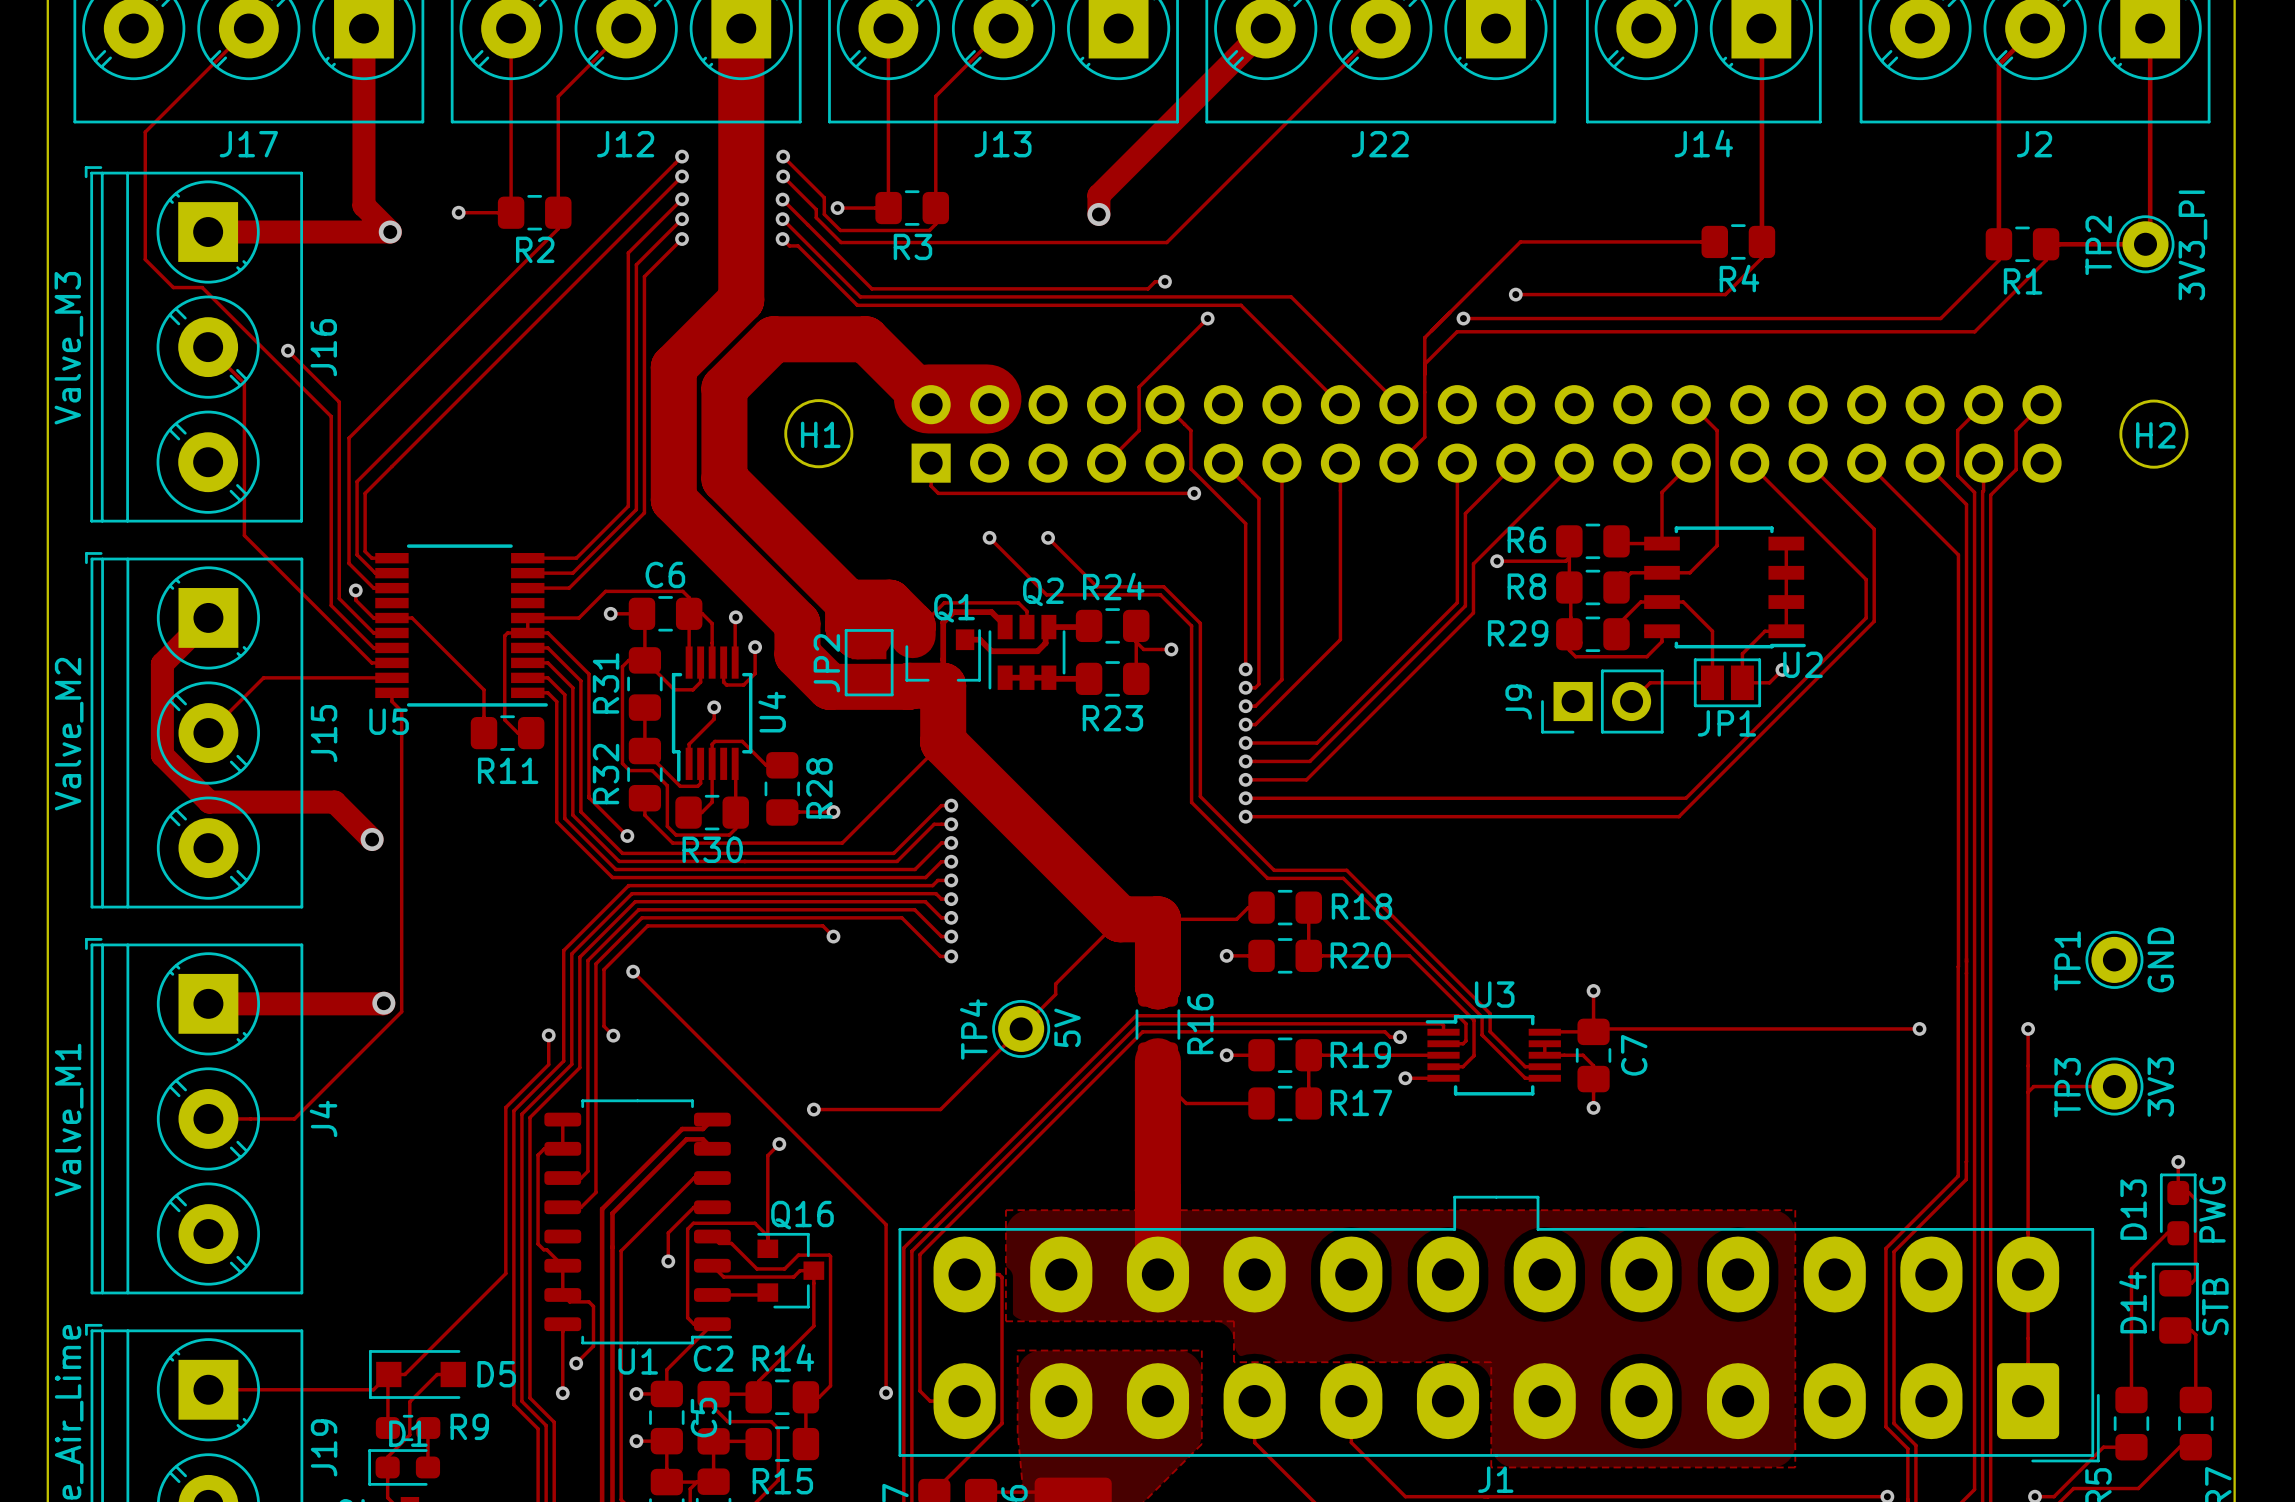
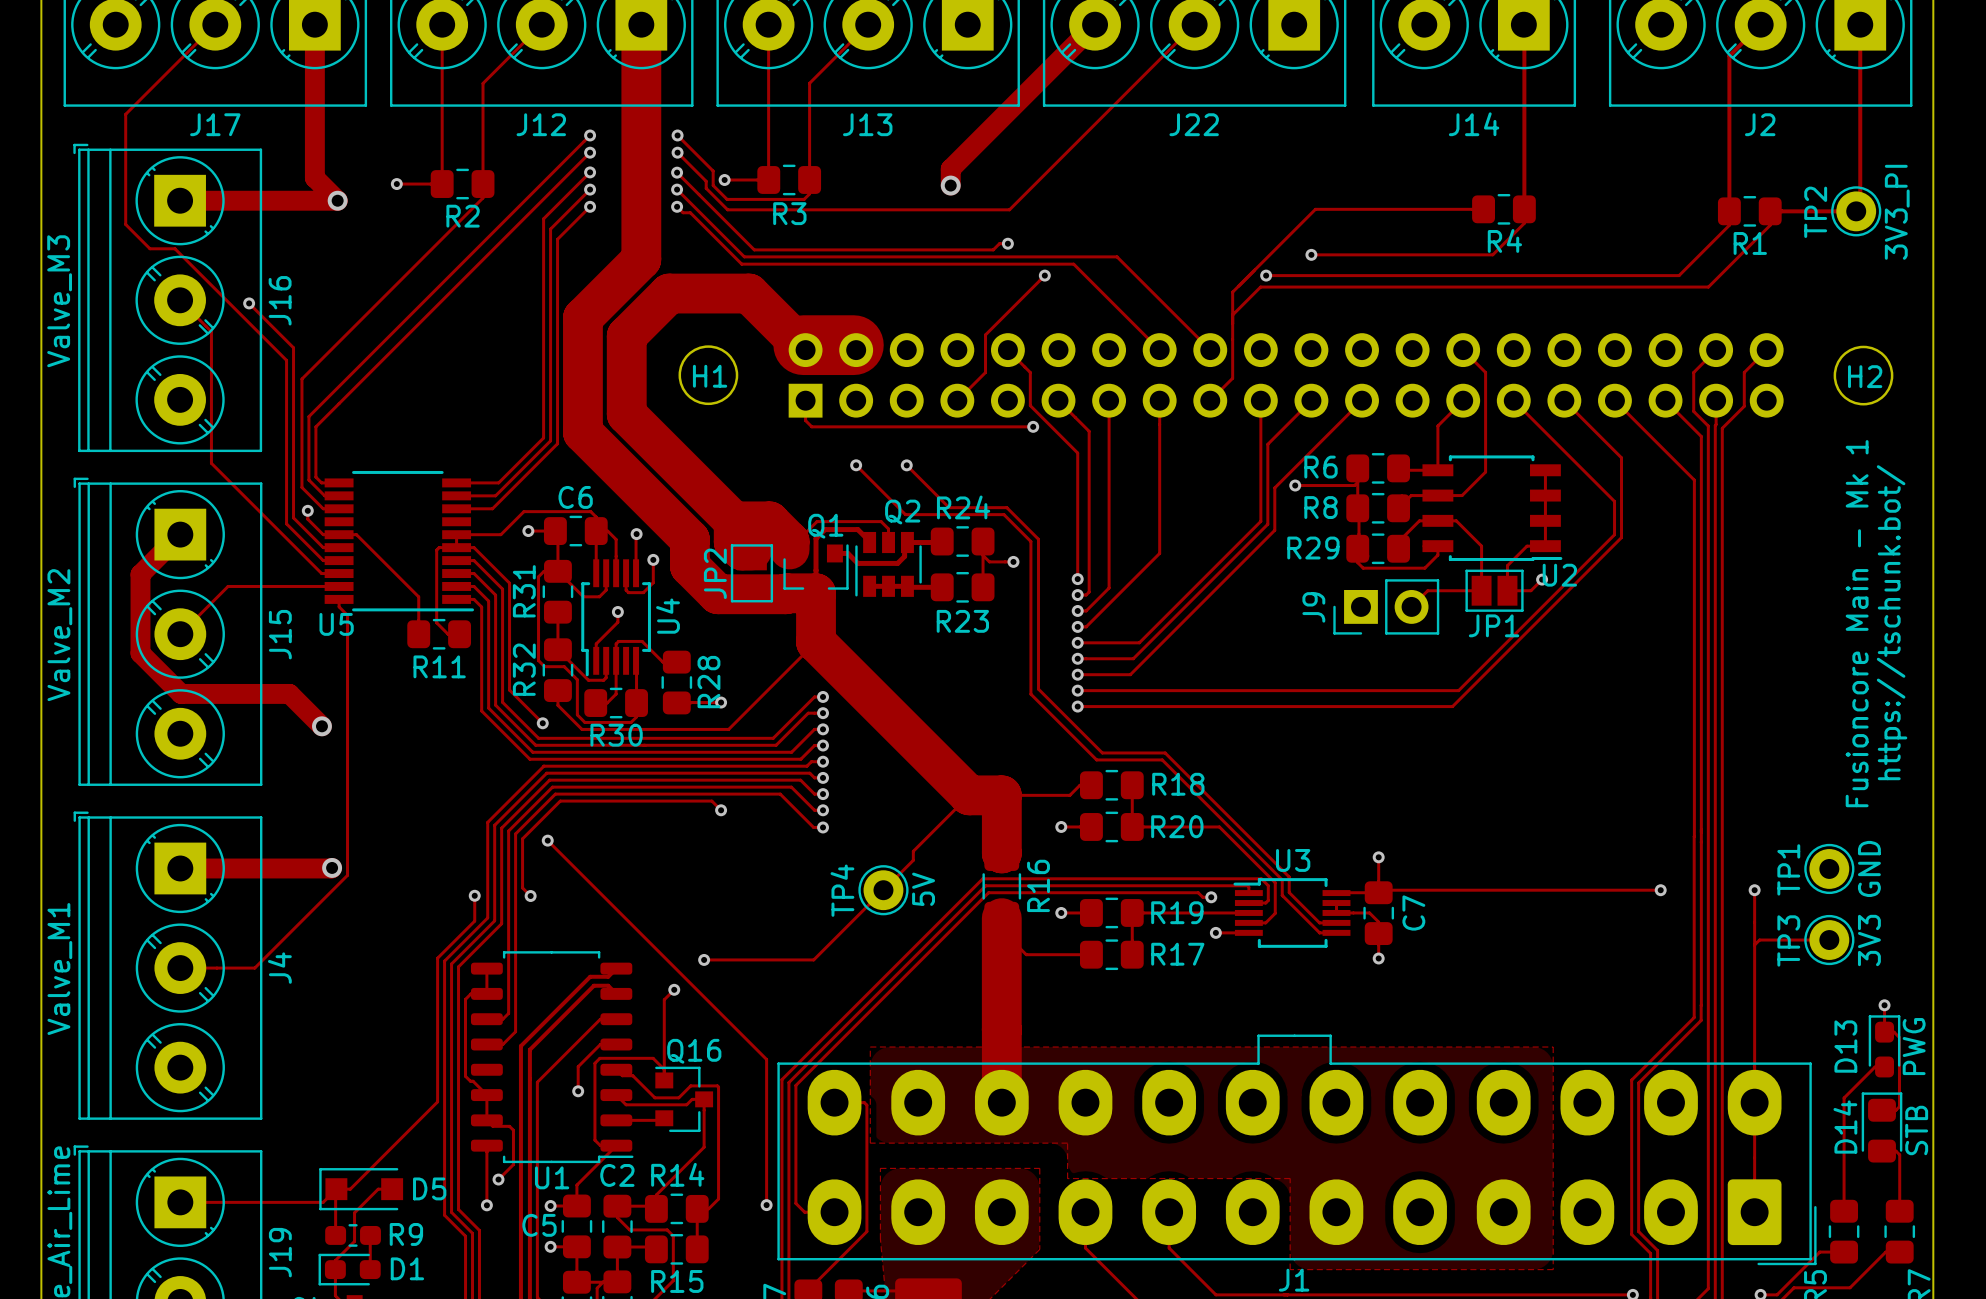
text: none -> https://tschunk.bot/ (1892, 622)
text: none -> Fusioncore Main - Mk 1 (1857, 623)
TP1 position: (2114, 959) -> (1829, 868)
C5 name rotation: 0° (703, 1417) -> 90° clockwise (539, 1225)
C5 name position: C5 (703, 1417) -> C5 (539, 1225)
D1 name position: D1 (408, 1433) -> D1 (407, 1268)

